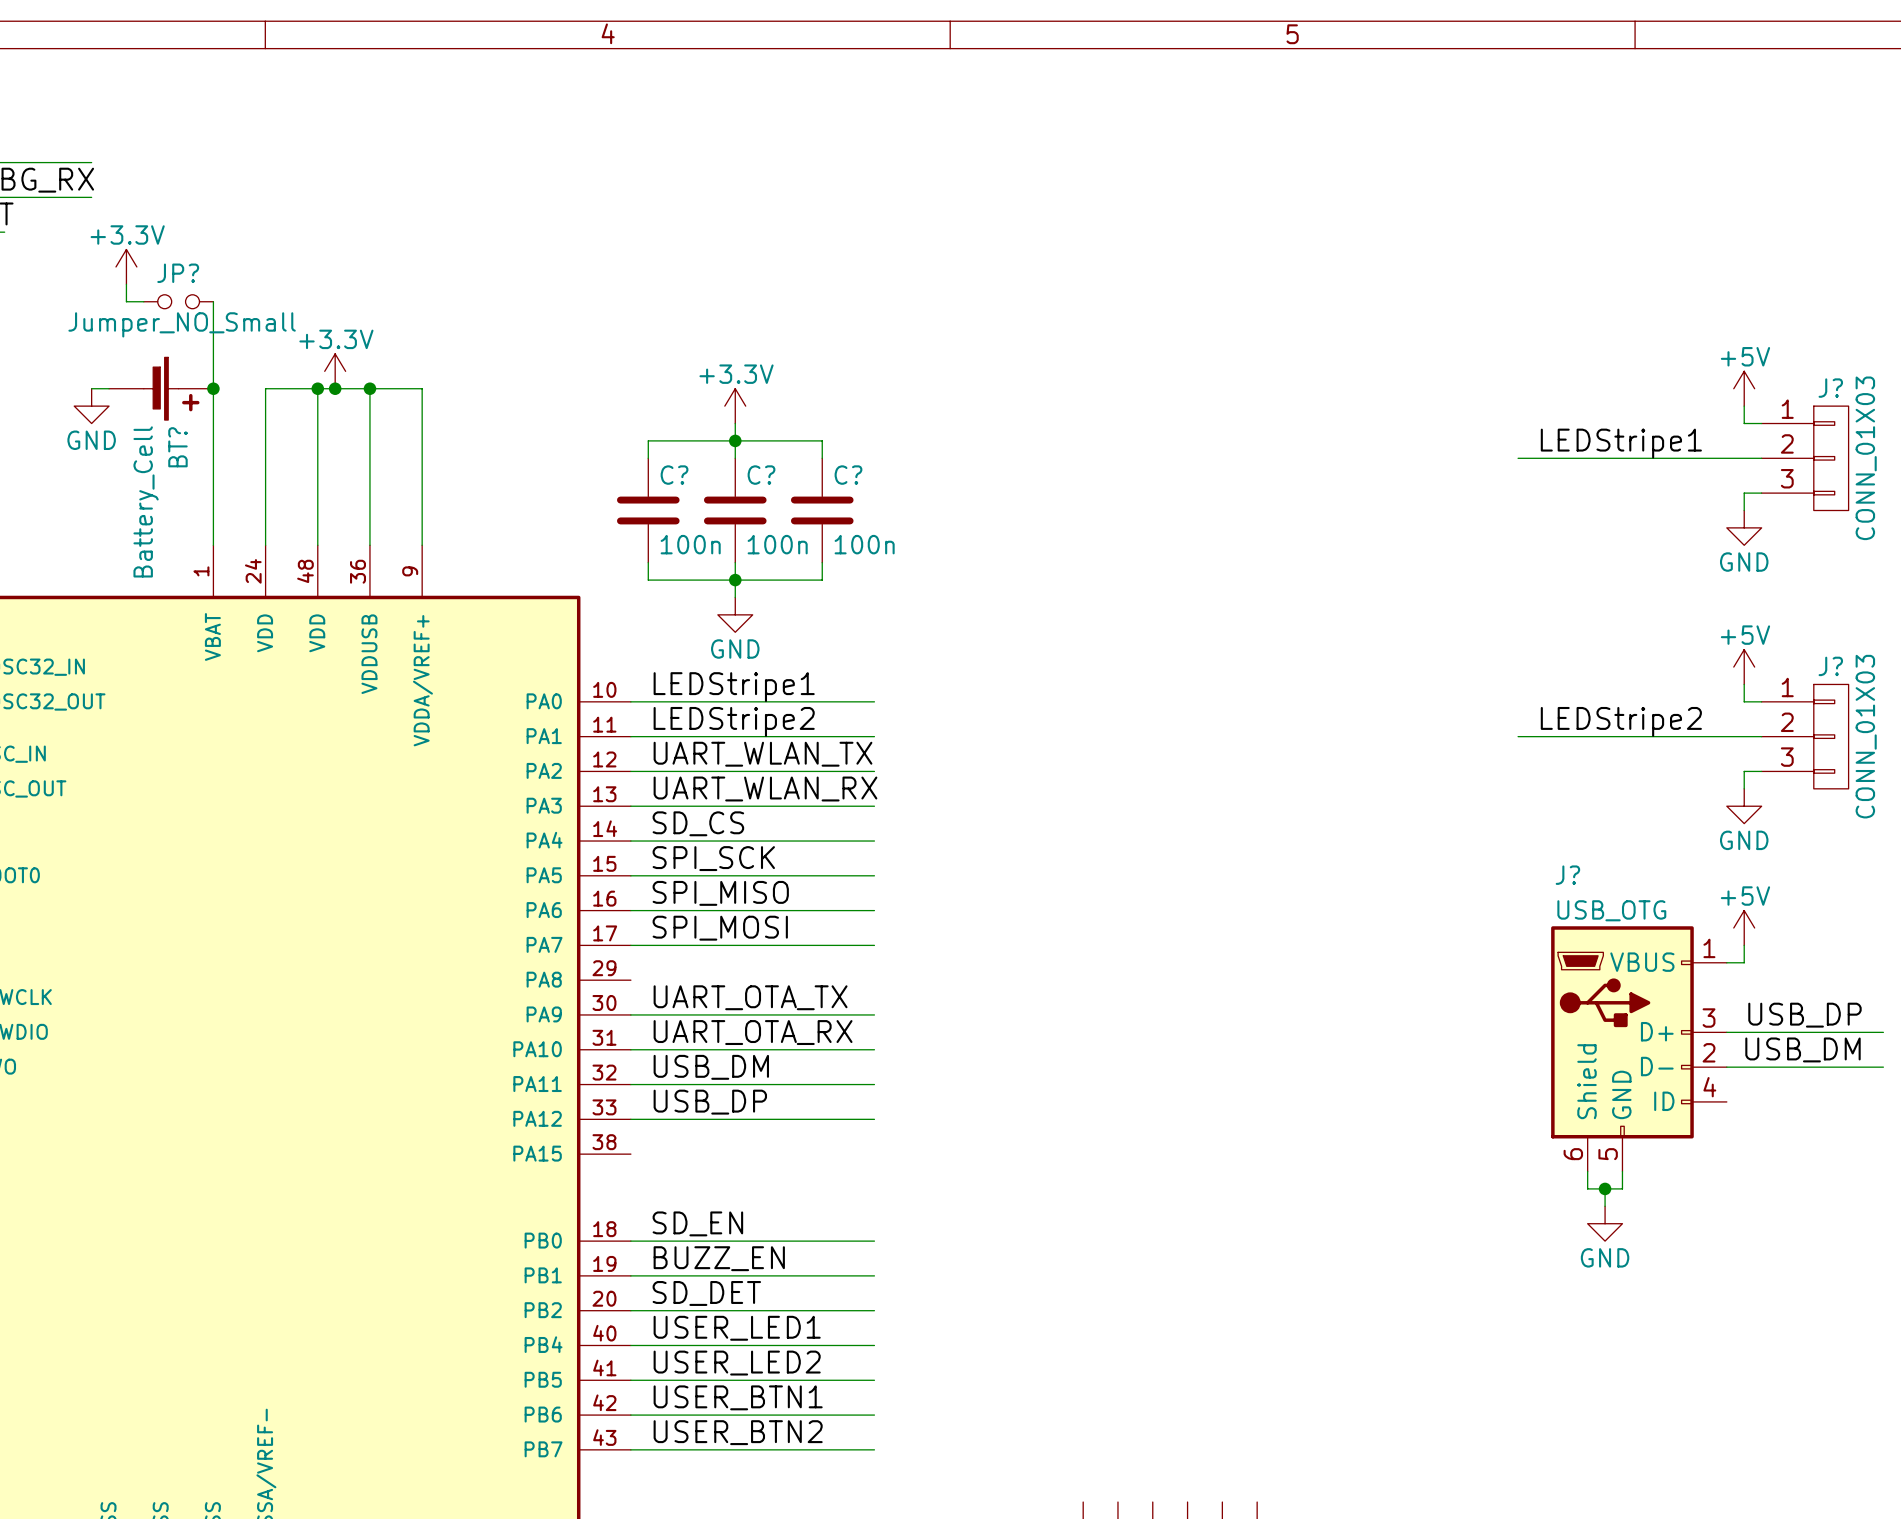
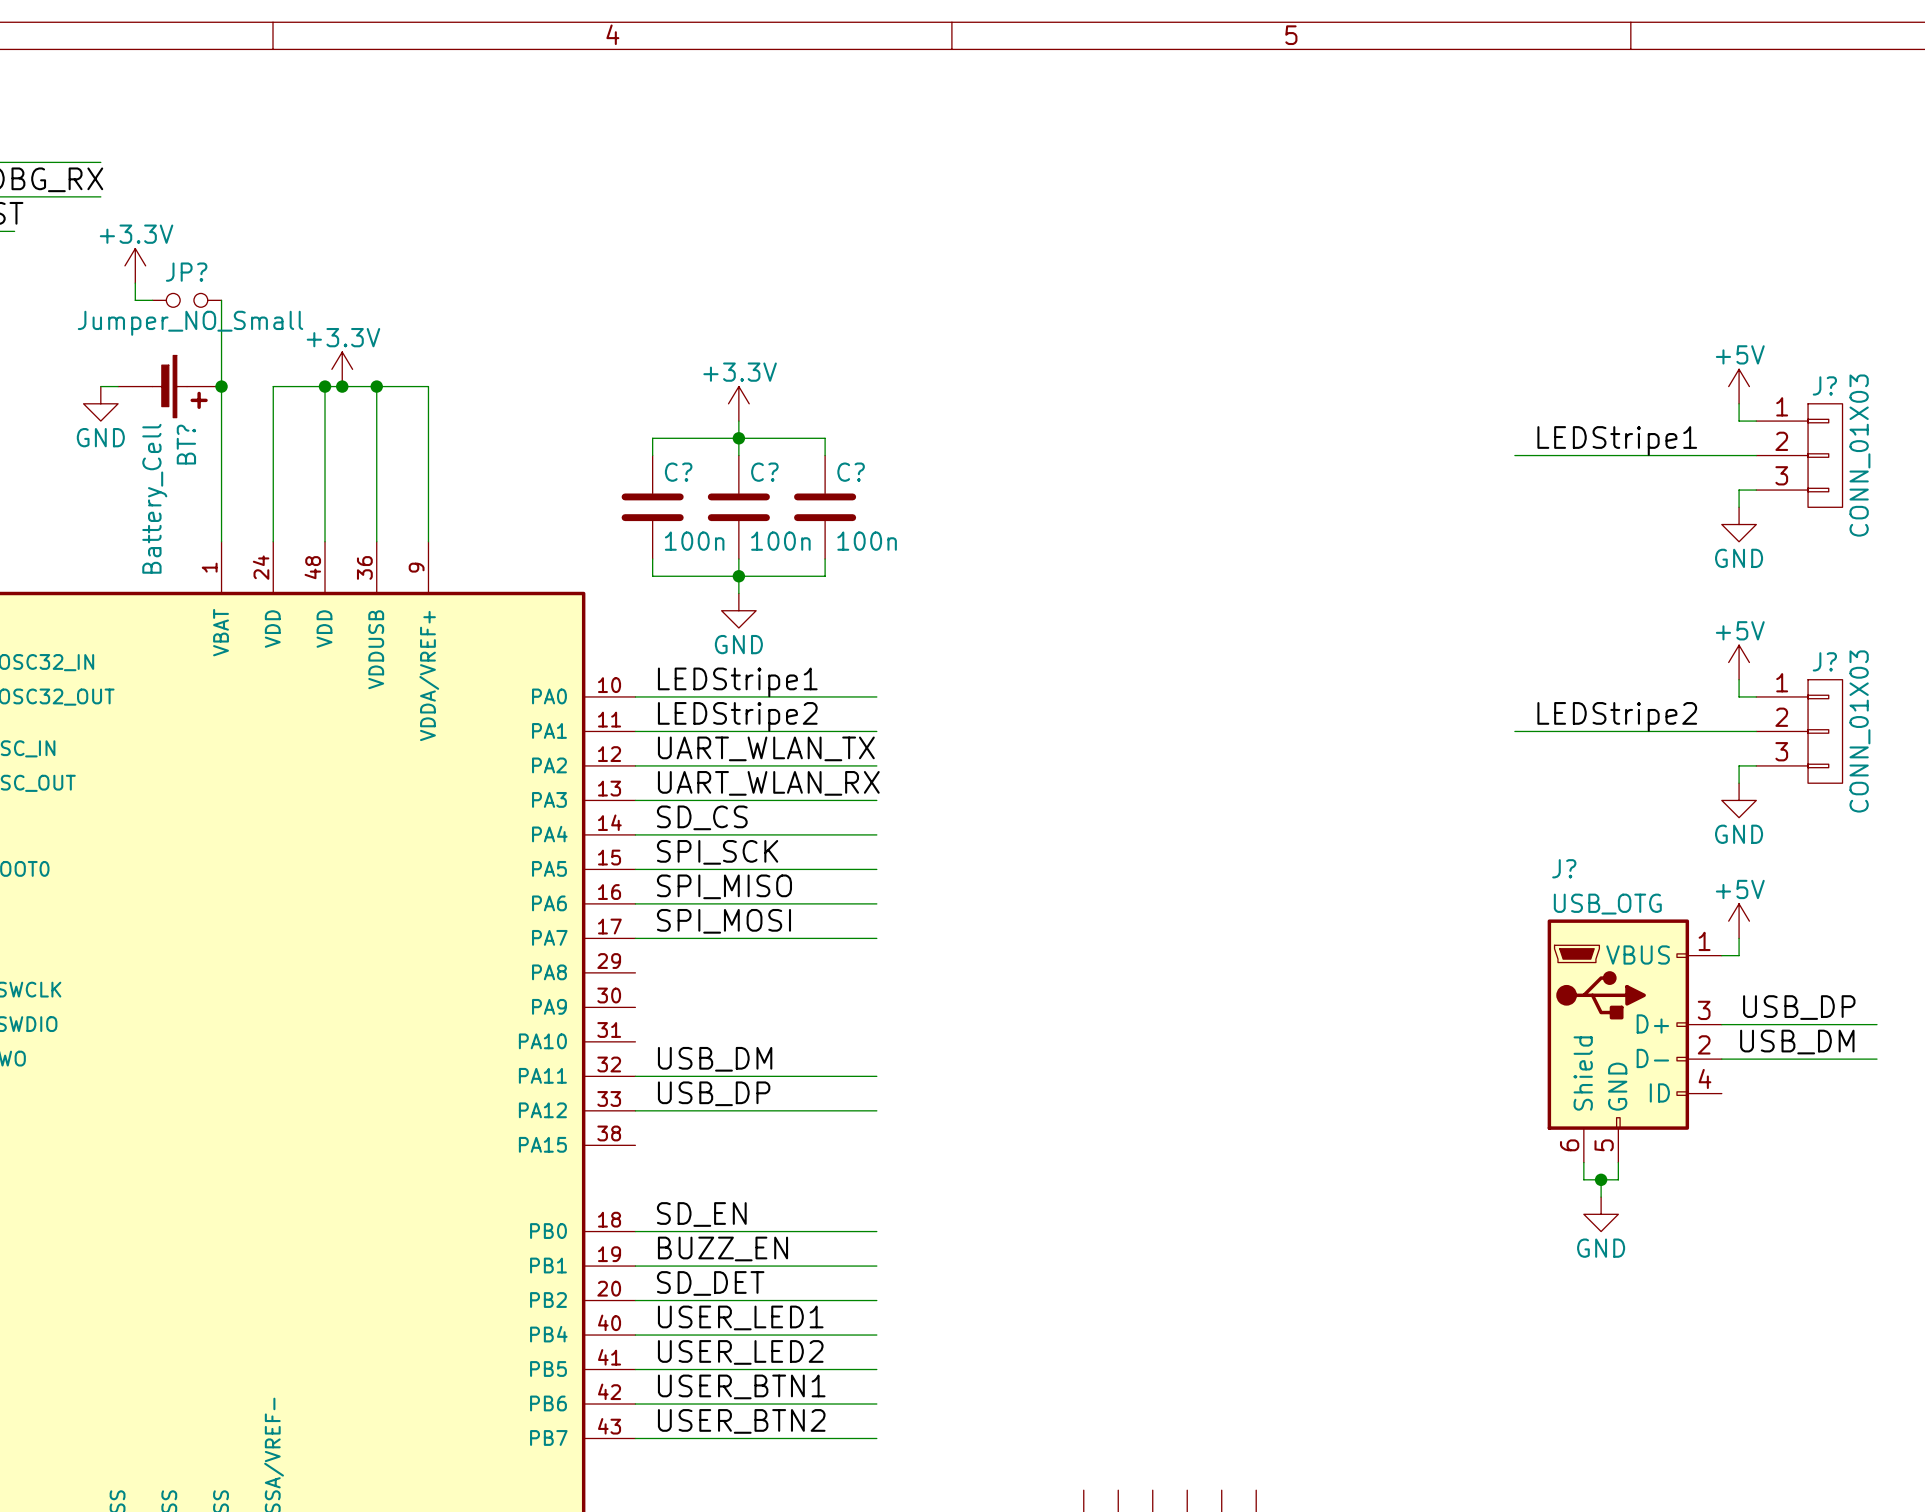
label: UART_OTA_TX (750, 997) -> none
wire: (630, 1014) (874, 1014) -> none
label: UART_OTA_RX (753, 1032) -> none
wire: (630, 1049) (874, 1049) -> none

